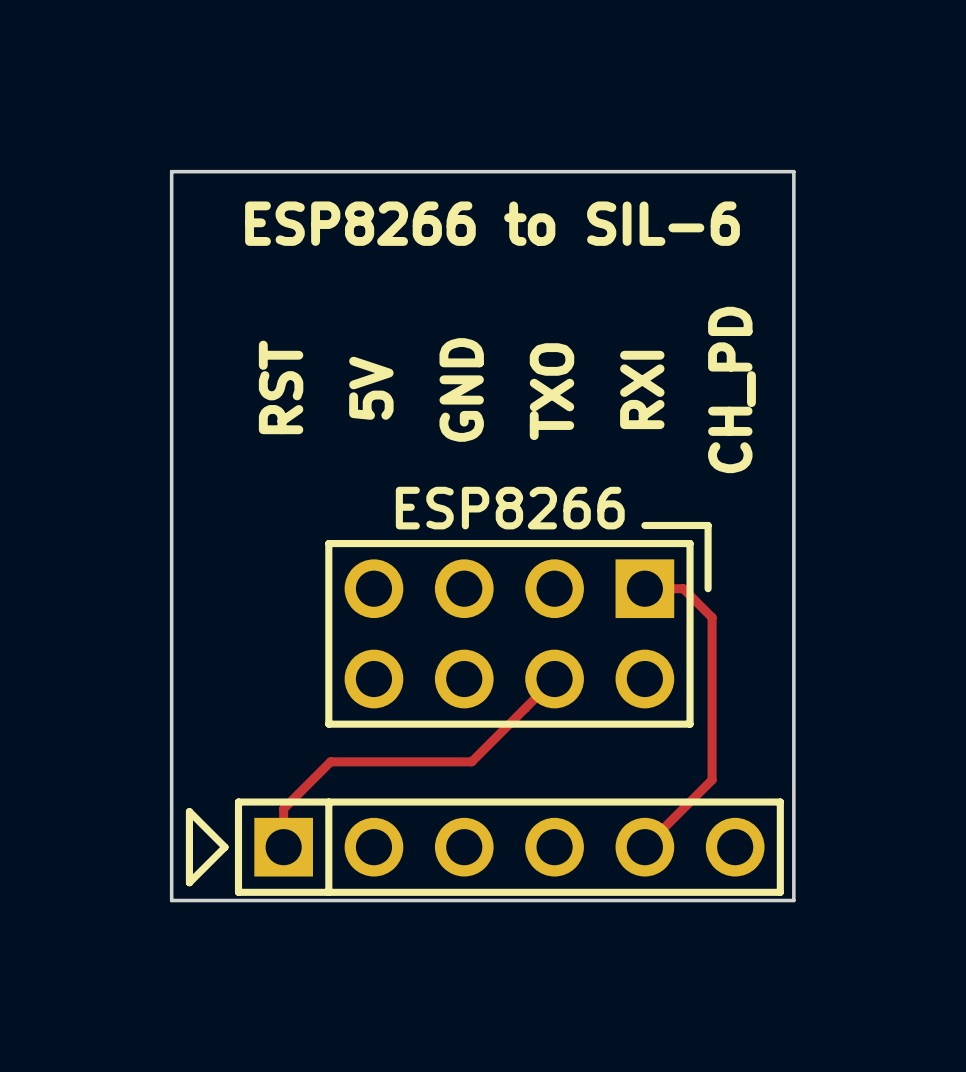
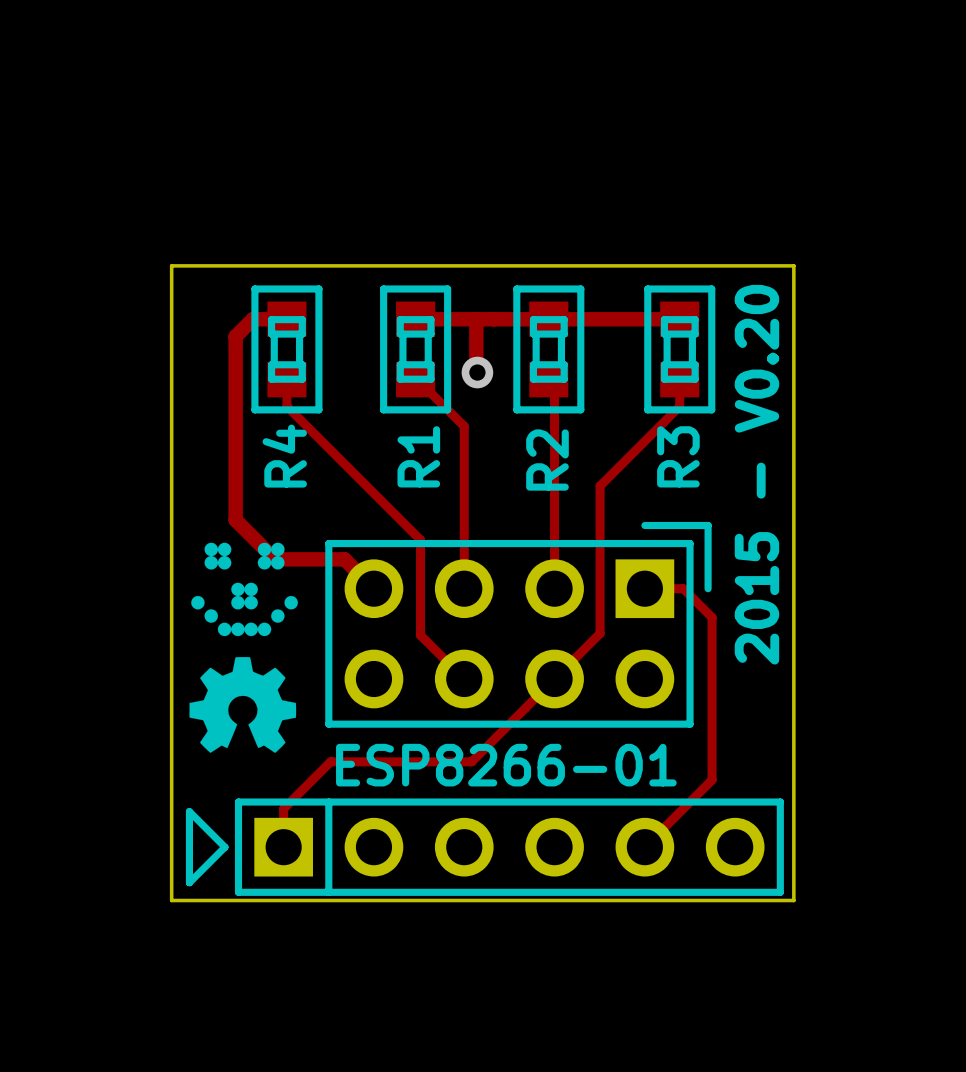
text: ESP8266 to SIL-6 (492, 223) -> none
board edge: (171, 265) (171, 171) (793, 171) (793, 265) -> (171, 265) (793, 265)
track: none -> (286, 319) (252, 319) (235, 336) (235, 520) (274, 559) (344, 559) (373, 588)
track: none -> (415, 319) (679, 319)
track: none -> (476, 319) (477, 372)
R4: none -> (286, 349)
R1: none -> (415, 349)
R2: none -> (548, 349)
R3: none -> (679, 349)
via: none -> (477, 372)
track: none -> (286, 379) (286, 406) (420, 539) (420, 635) (464, 679)
track: none -> (415, 379) (464, 426) (464, 588)
track: none -> (548, 379) (554, 385) (554, 588)
track: none -> (679, 379) (679, 406) (600, 486) (600, 633) (554, 679)
text: RST (281, 387) -> none
text: 5V (371, 388) -> none
text: GND (461, 389) -> none
text: RXI (642, 389) -> none
text: CH_PD (731, 389) -> none
text: TXO (552, 391) -> none
text: none -> 2015 - V0.20 (756, 474)
part value: ESP8266 (510, 508) -> ESP8266-01 (506, 765)
drawing: none -> [189, 542, 298, 753]

